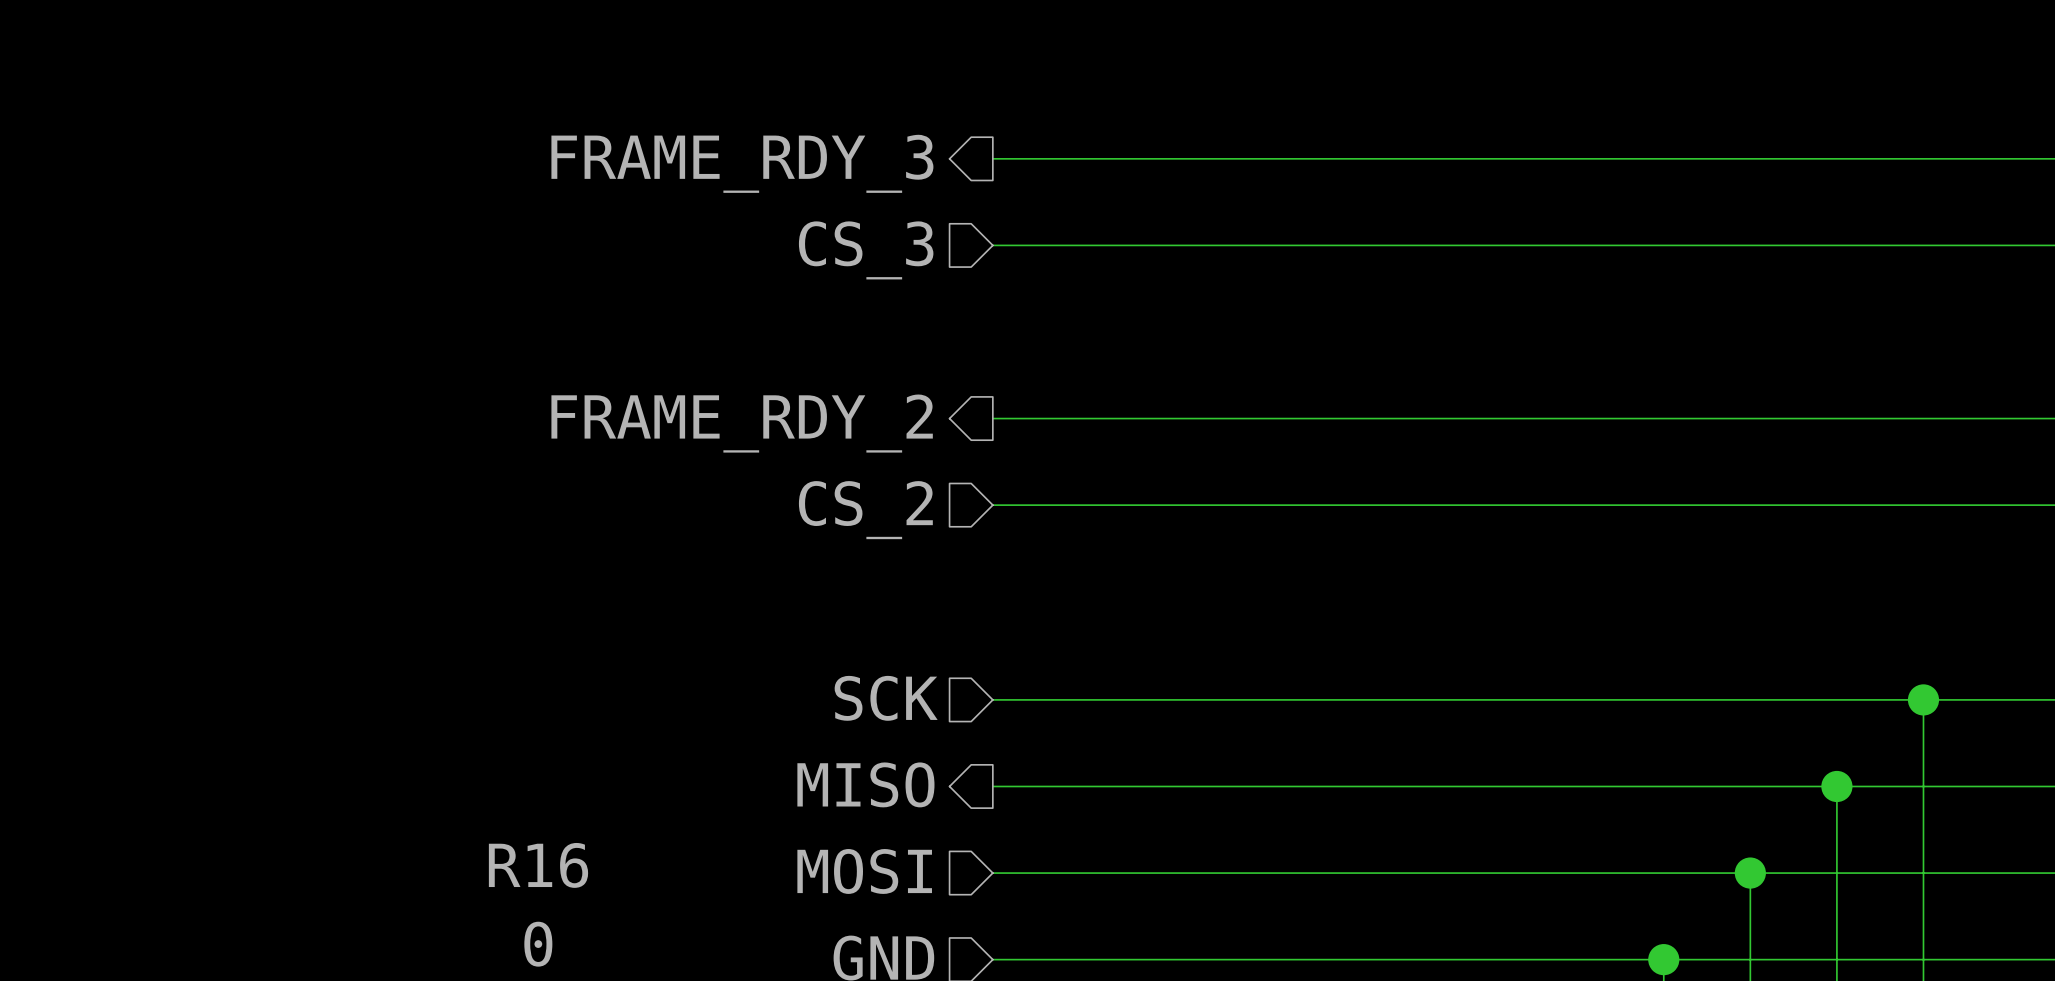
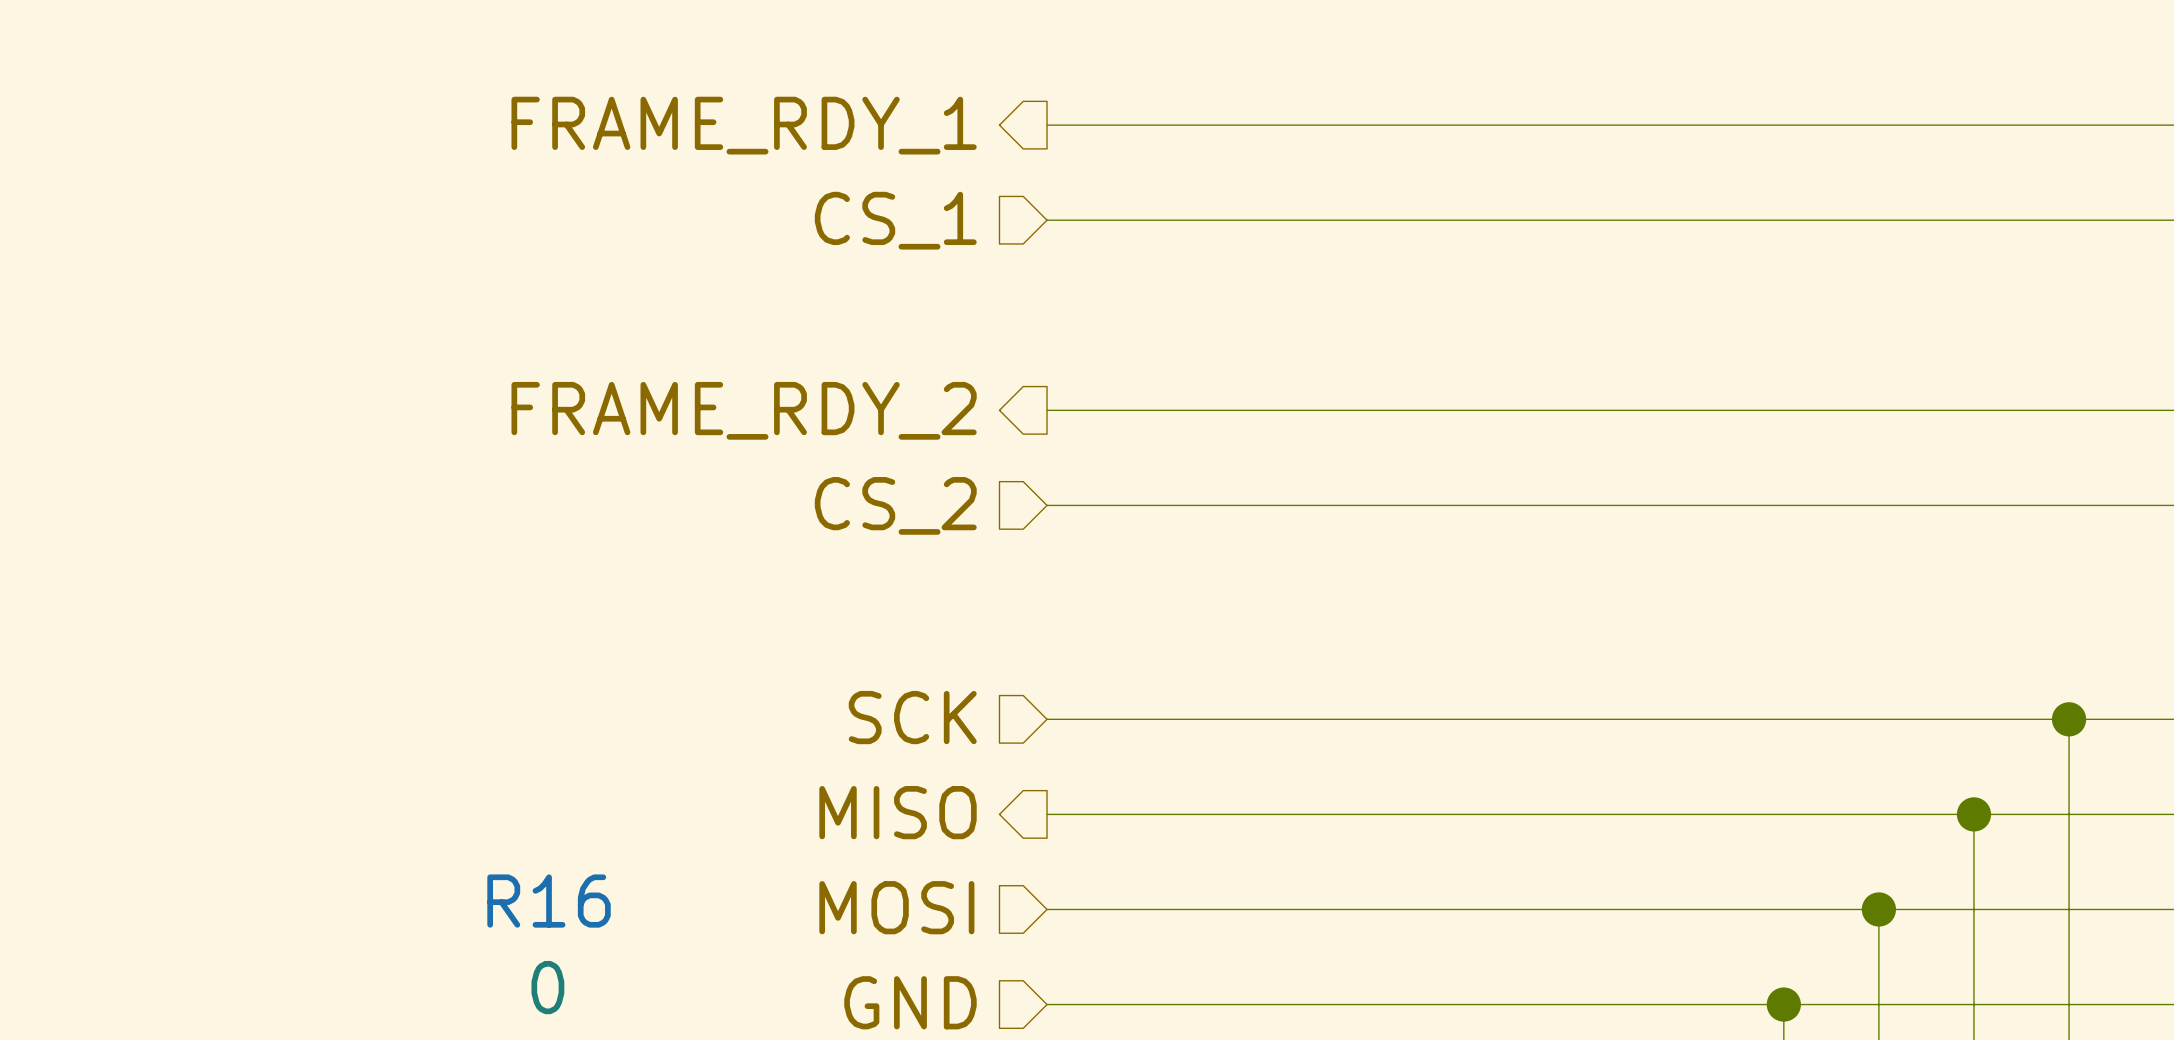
hierarchical label: FRAME_RDY_3 (742, 163) -> FRAME_RDY_1 (744, 125)
hierarchical label: CS_3 (866, 250) -> CS_1 (895, 220)

